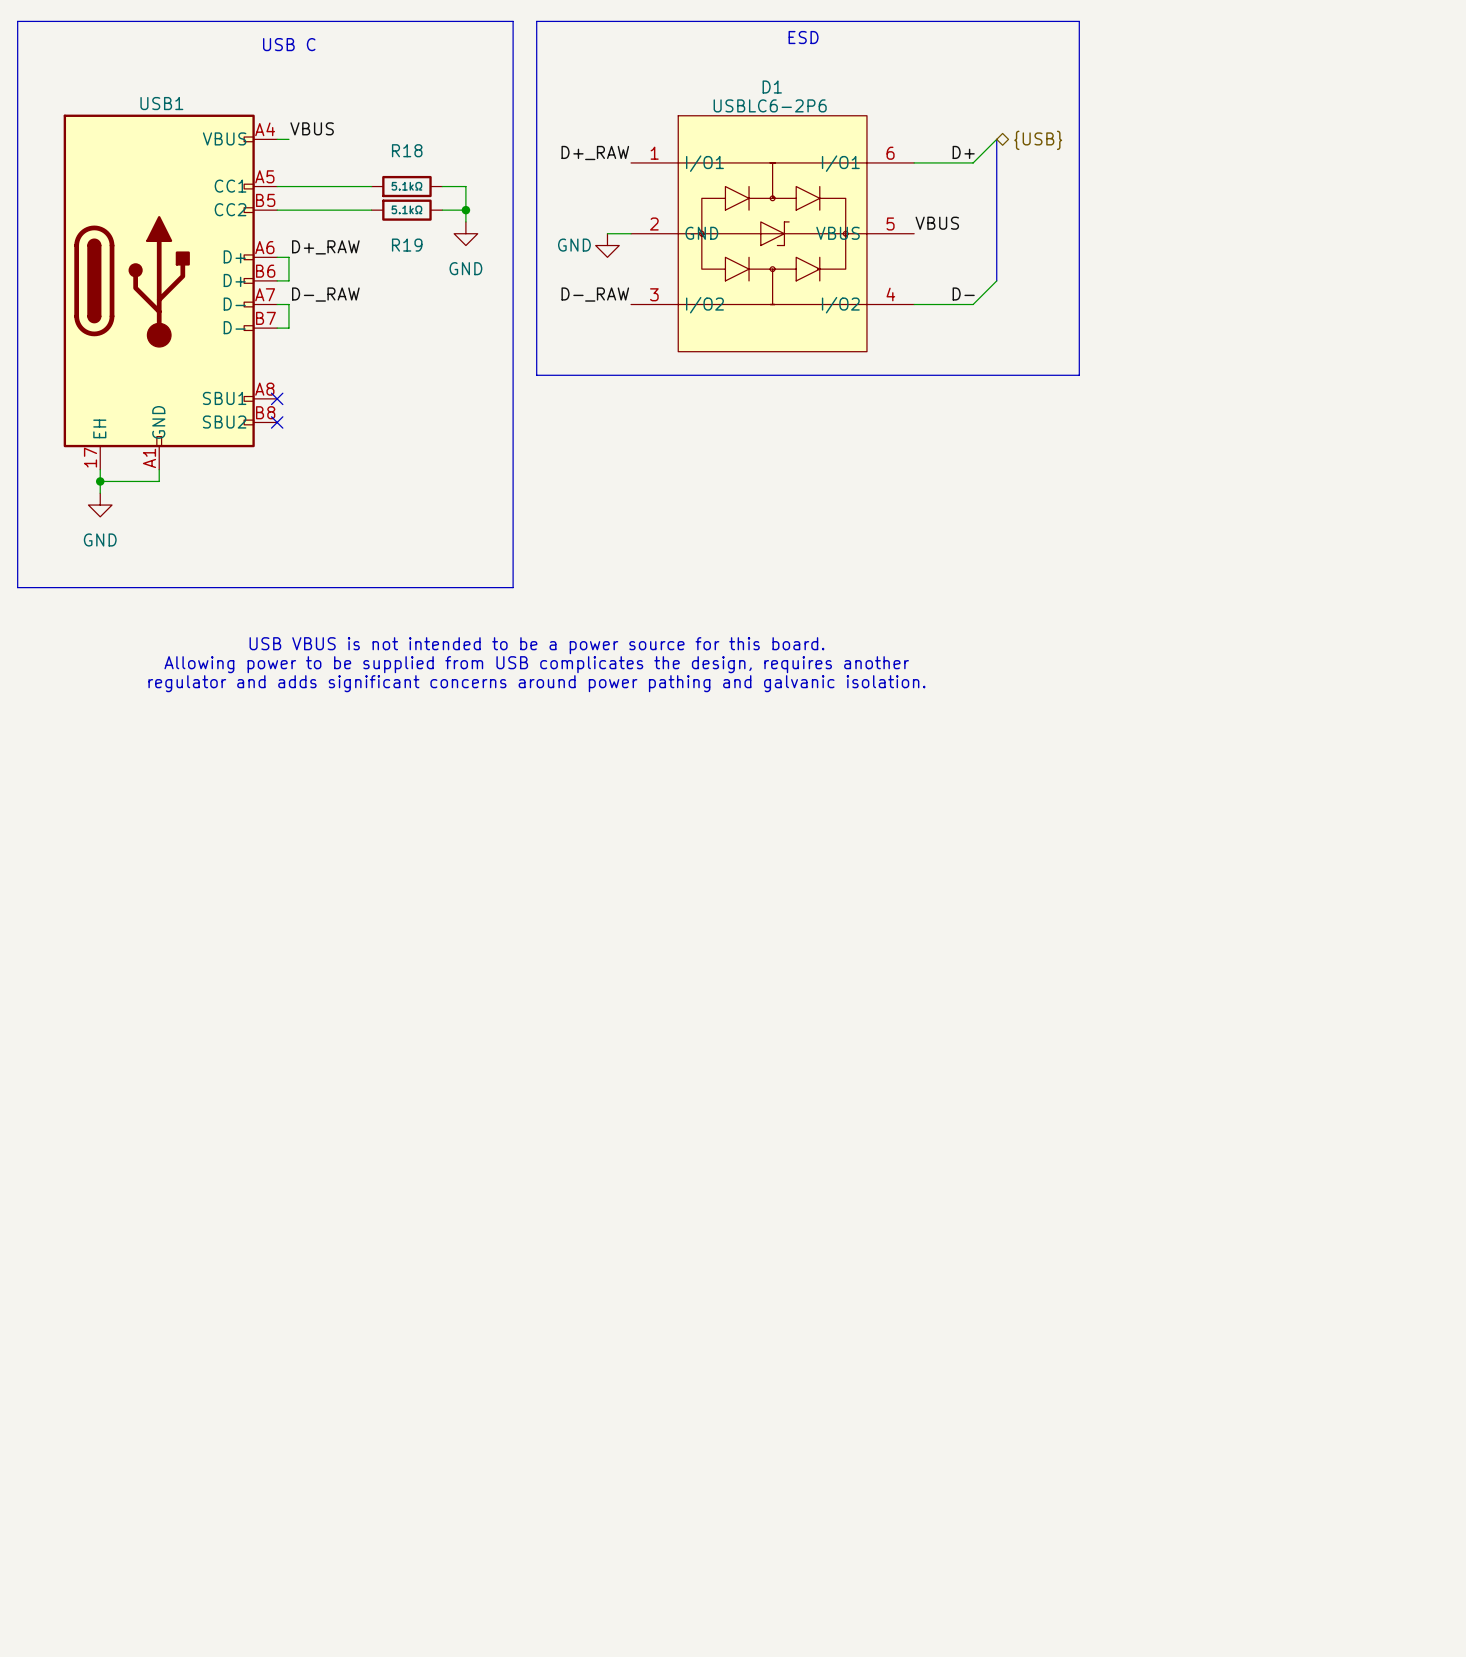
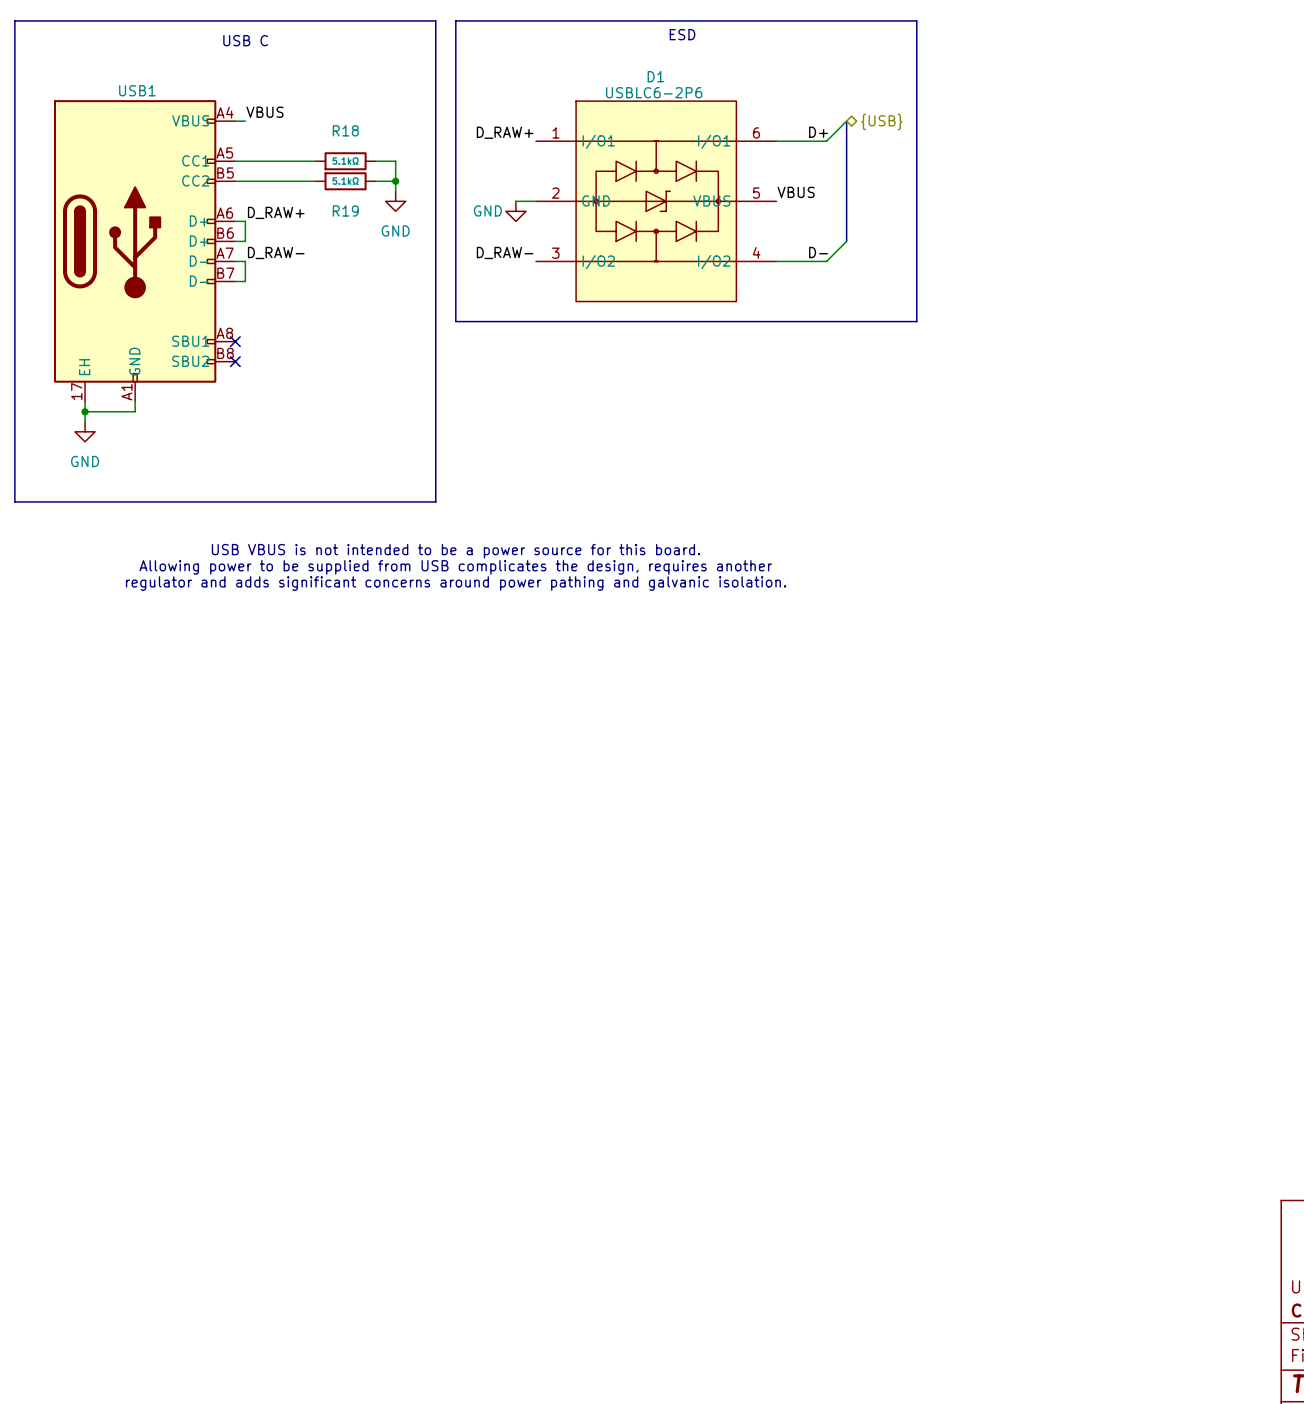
label: D+_RAW (595, 152) -> D_RAW+ (505, 132)
label: D+_RAW (325, 247) -> D_RAW+ (276, 212)
label: D-_RAW (325, 294) -> D_RAW- (276, 252)
label: D-_RAW (595, 294) -> D_RAW- (505, 252)

